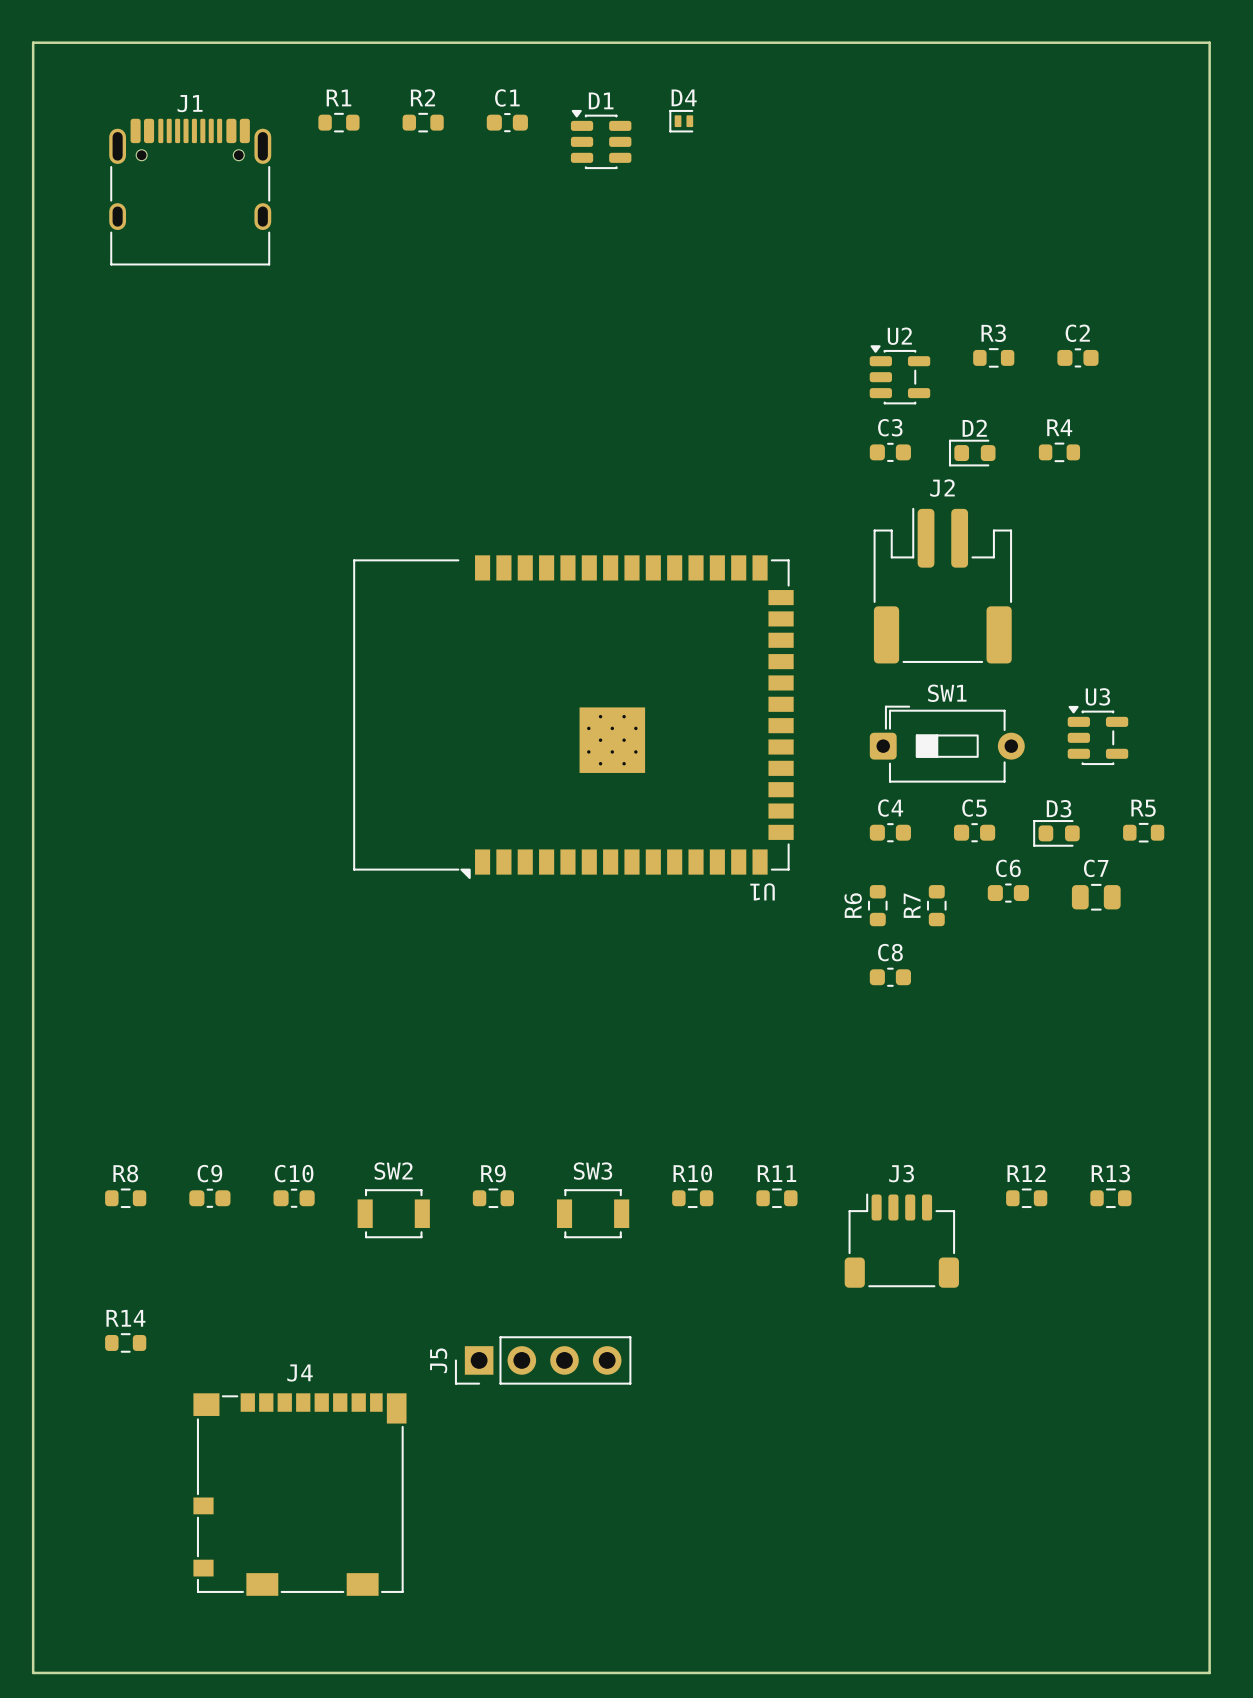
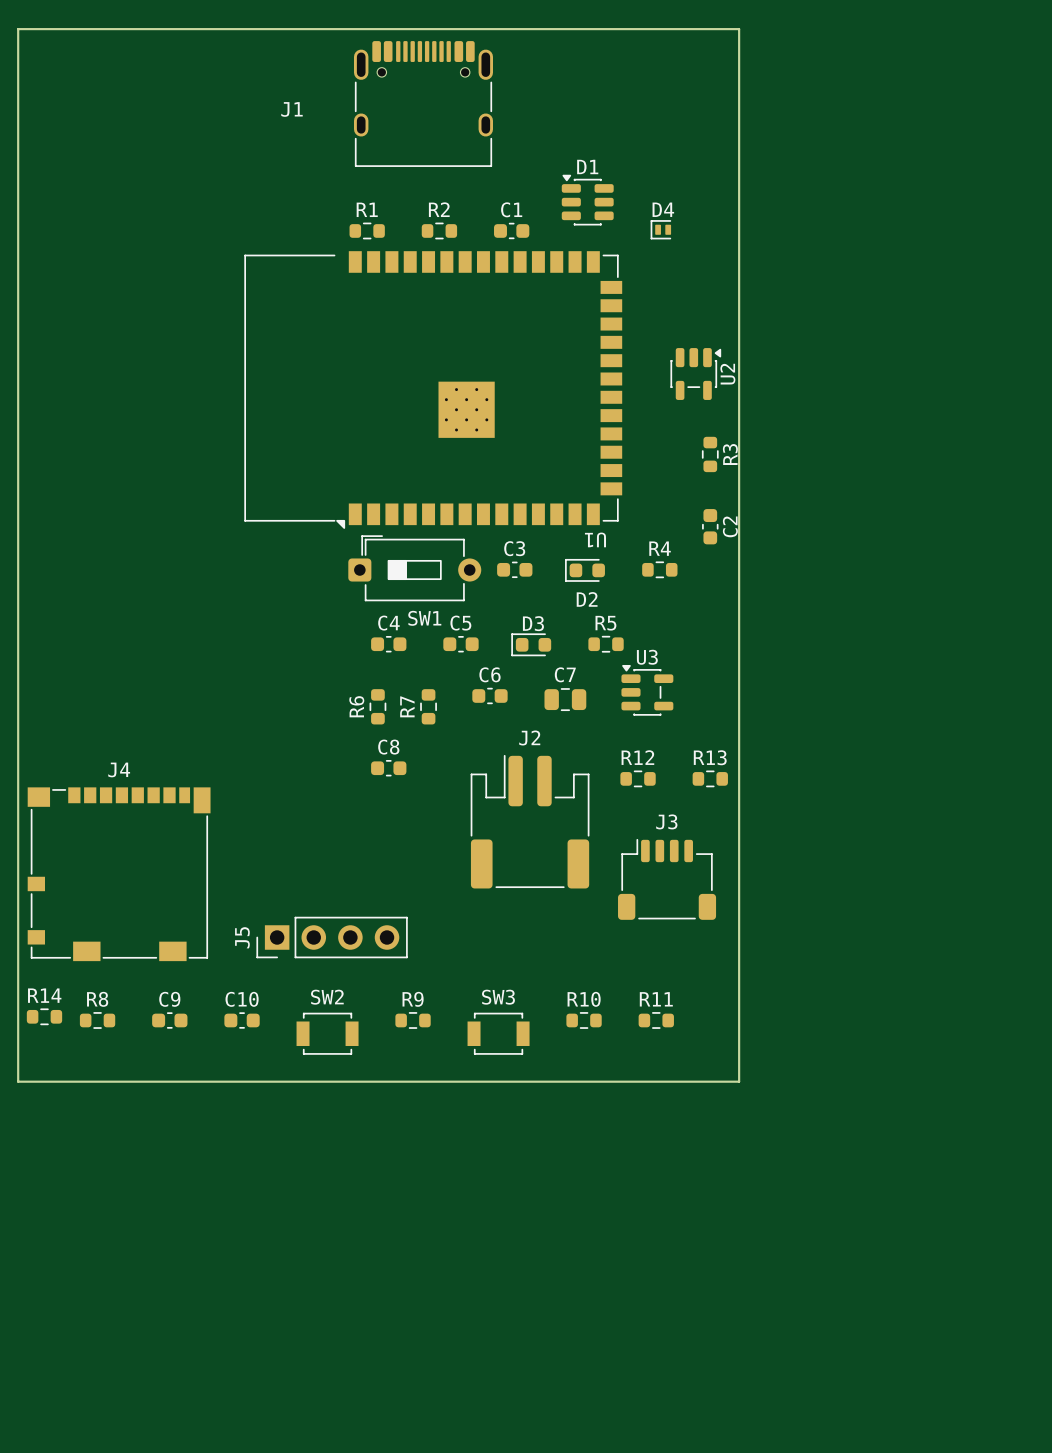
board edge: (873, 42) (1209, 42) (1209, 1672) (33, 1672) (33, 1269) -> (739, 29) (739, 1081) (18, 1081)
J1 name position: J1 (190, 103) -> J1 (292, 109)
D4 position: (681, 121) -> (660, 229)
R1 position: (338, 122) -> (367, 230)
R2 position: (423, 122) -> (439, 230)
C1 position: (507, 122) -> (511, 230)
D1 position: (601, 139) -> (587, 200)
J1 position: (190, 192) -> (423, 104)
R3 rotation: 0° (993, 357) -> 90° clockwise (710, 454)
R3 position: (993, 357) -> (710, 454)
C2 rotation: 0° (1077, 357) -> 90° clockwise (710, 526)
C2 position: (1077, 357) -> (710, 526)
U2 rotation: 0° (899, 374) -> 90° clockwise (695, 374)
U2 position: (899, 374) -> (695, 374)
D2 name position: D2 (974, 428) -> D2 (587, 599)
C3 position: (890, 452) -> (514, 569)
R4 position: (1059, 452) -> (659, 569)
D2 position: (972, 453) -> (584, 570)
J2 position: (942, 585) -> (530, 821)
SW1 name position: SW1 (947, 693) -> SW1 (424, 618)
U1 position: (573, 717) -> (433, 390)
U3 position: (1097, 735) -> (647, 690)
SW1 position: (947, 744) -> (414, 568)
C4 position: (890, 832) -> (388, 644)
C5 position: (974, 832) -> (460, 644)
R5 position: (1143, 832) -> (606, 644)
D3 position: (1056, 833) -> (531, 644)
C6 position: (1008, 893) -> (489, 695)
C7 position: (1096, 897) -> (565, 699)
R6 position: (877, 905) -> (377, 706)
R7 position: (936, 905) -> (428, 706)
C8 position: (890, 977) -> (388, 768)
R12 position: (1026, 1198) -> (638, 778)
R13 position: (1110, 1198) -> (710, 778)
J3 position: (901, 1240) -> (667, 879)
R14 position: (125, 1342) -> (44, 1016)
J5 position: (543, 1360) -> (332, 937)
J4 position: (299, 1494) -> (119, 874)

